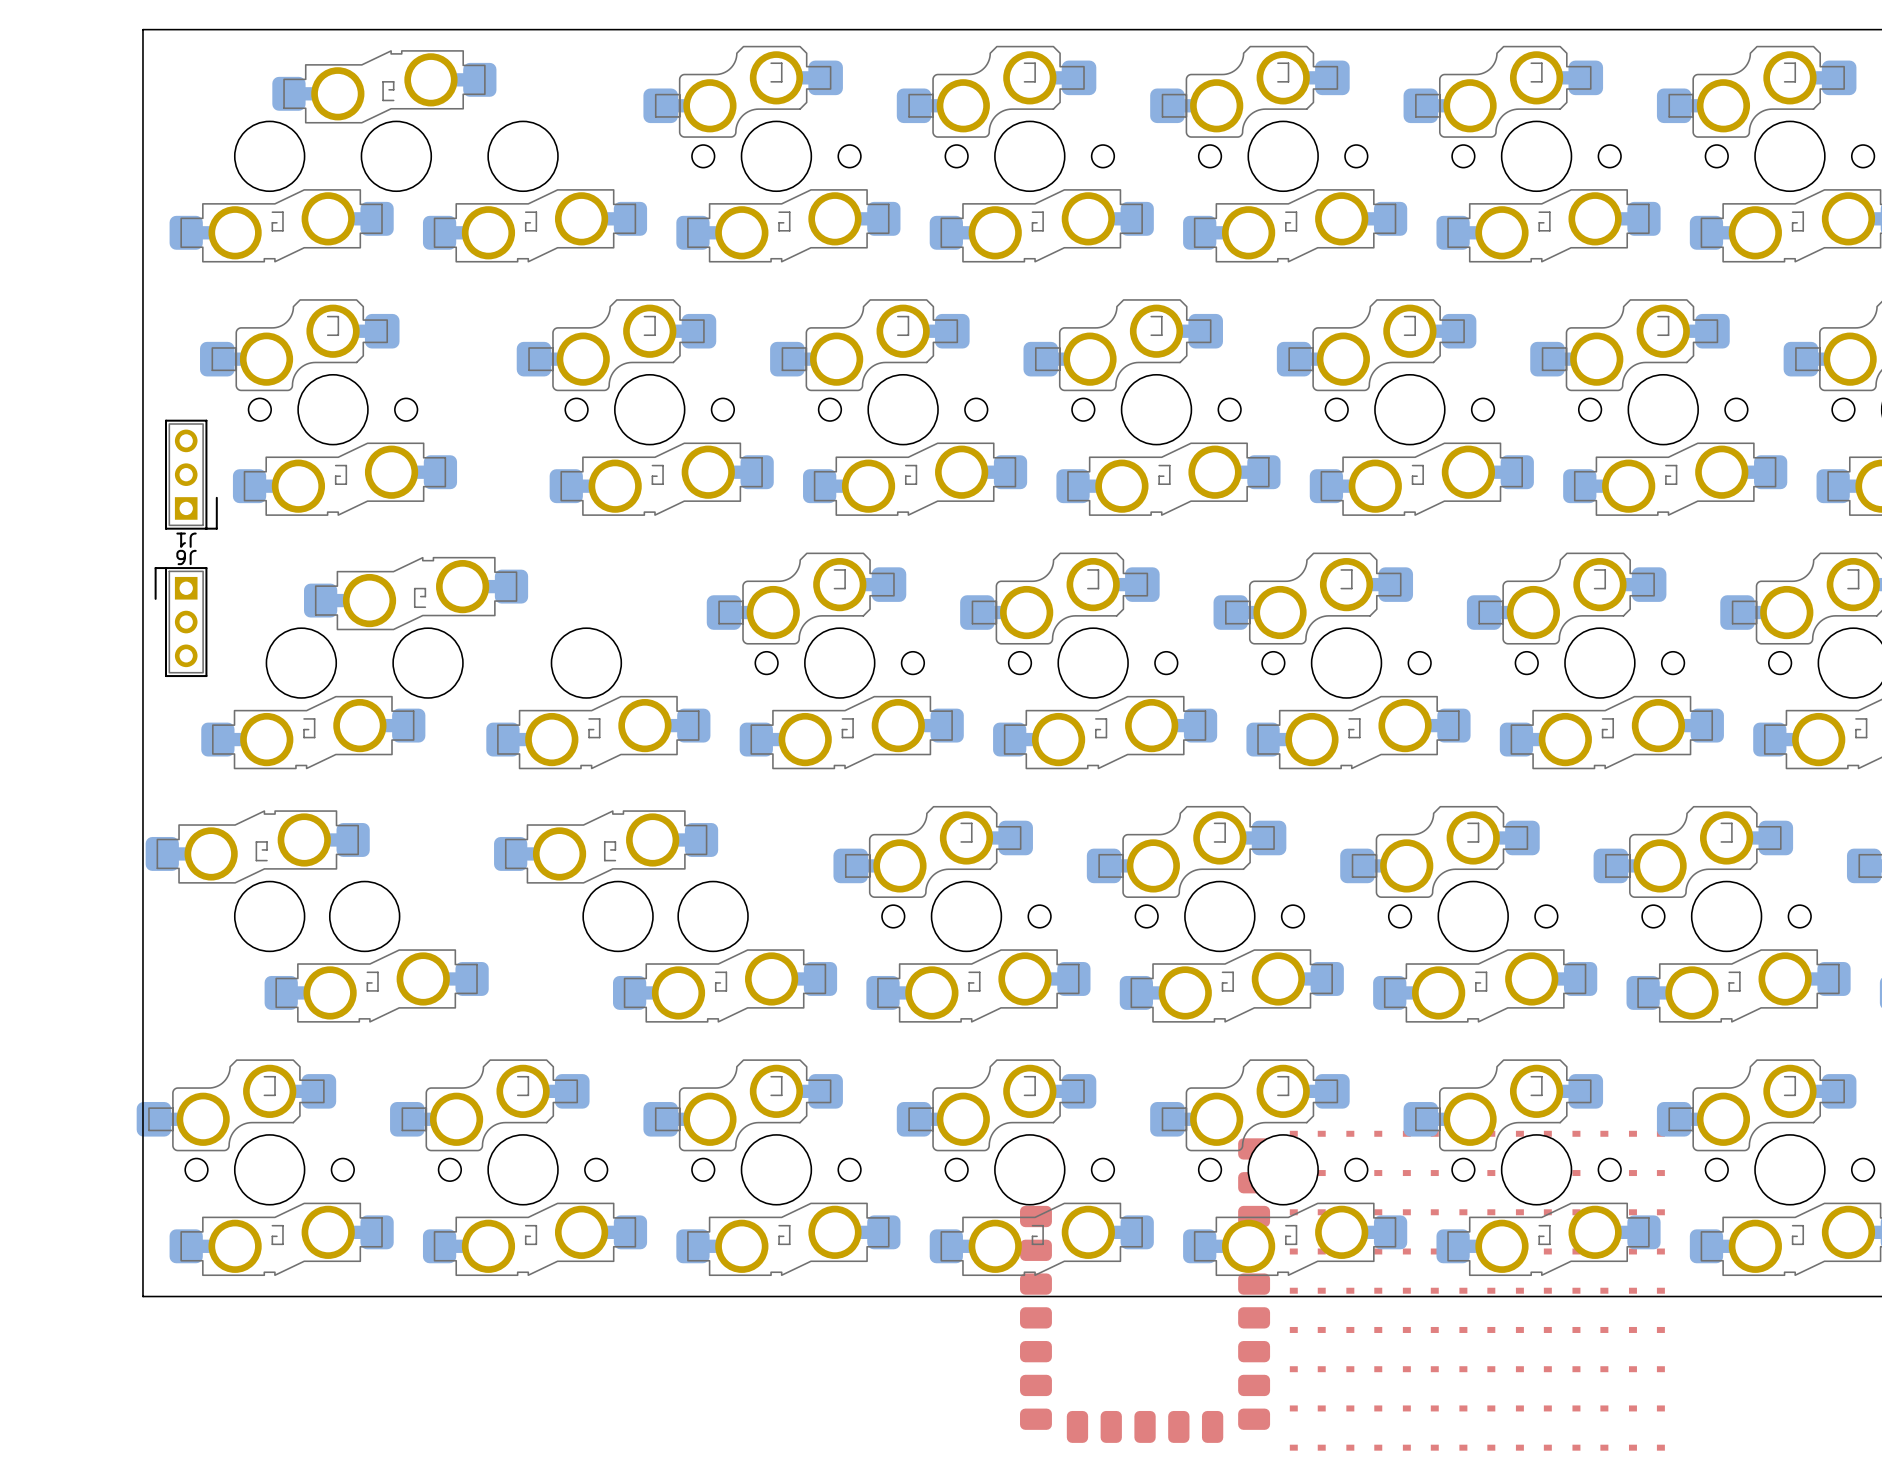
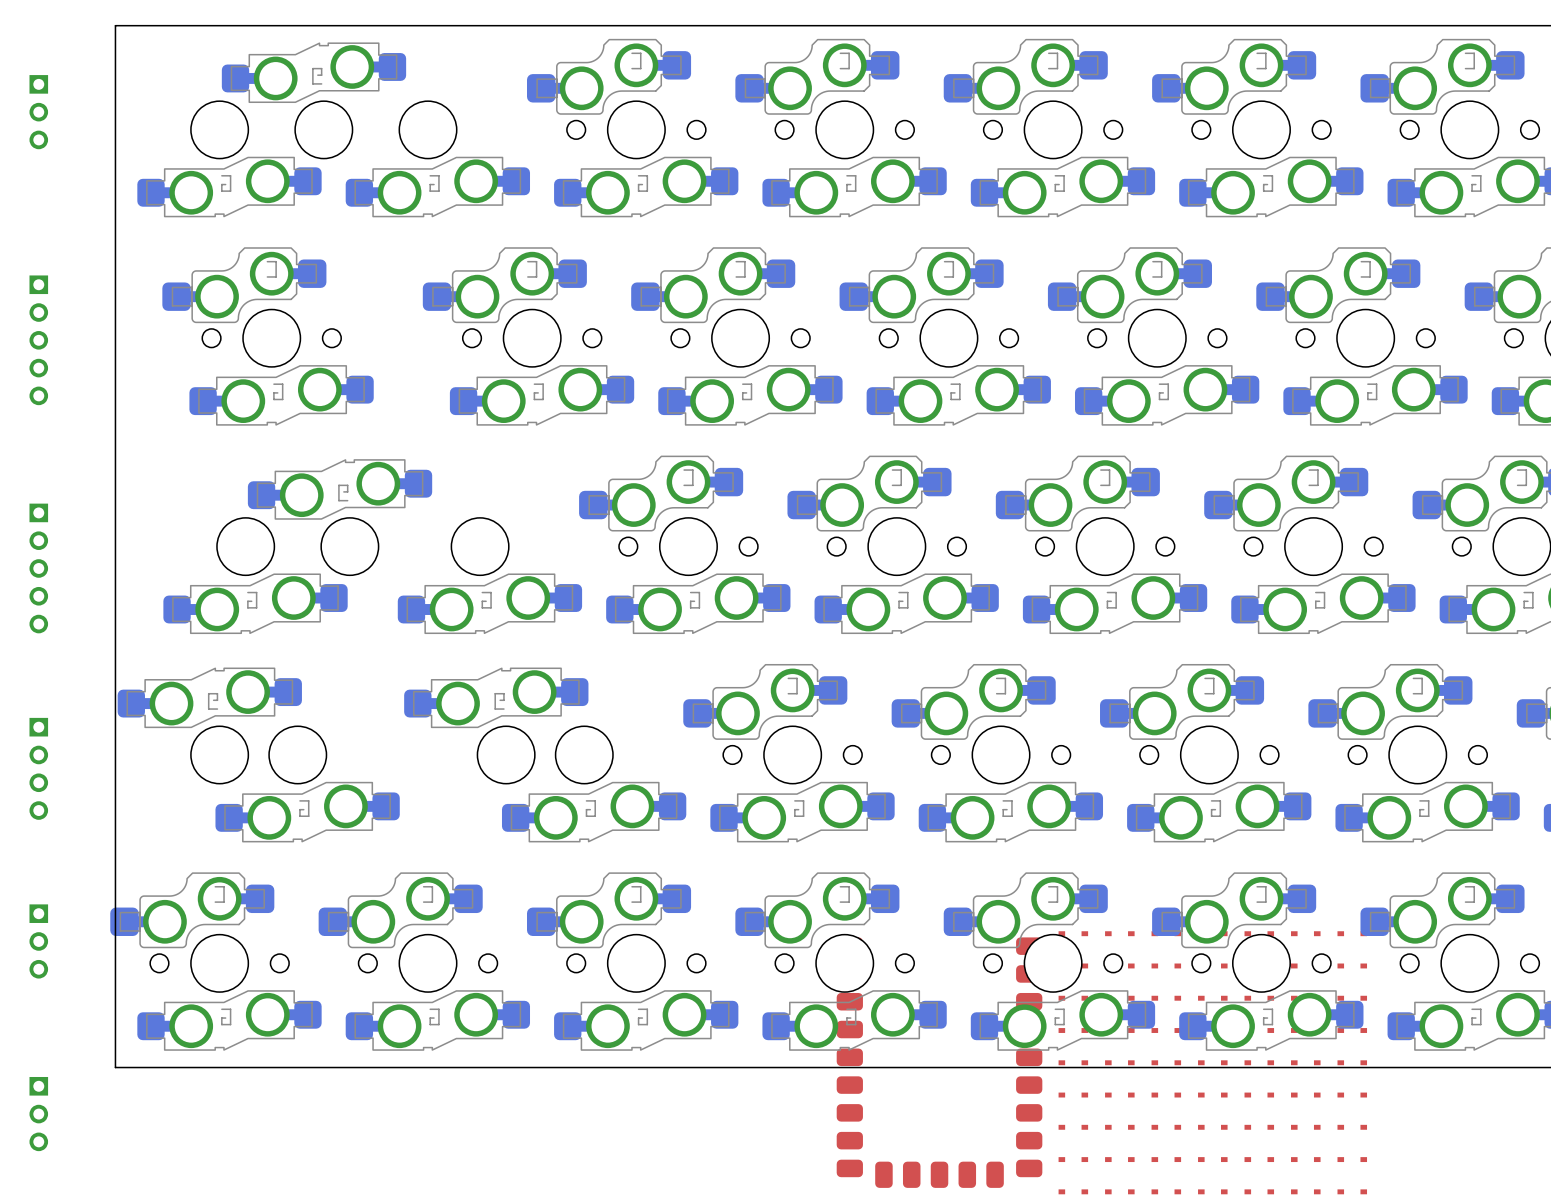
part: none -> (38, 112)
part: none -> (38, 340)
J1: (191, 474) -> none
J6: (181, 622) -> none
part: none -> (38, 568)
part: none -> (38, 768)
part: none -> (38, 941)
part: none -> (38, 1114)

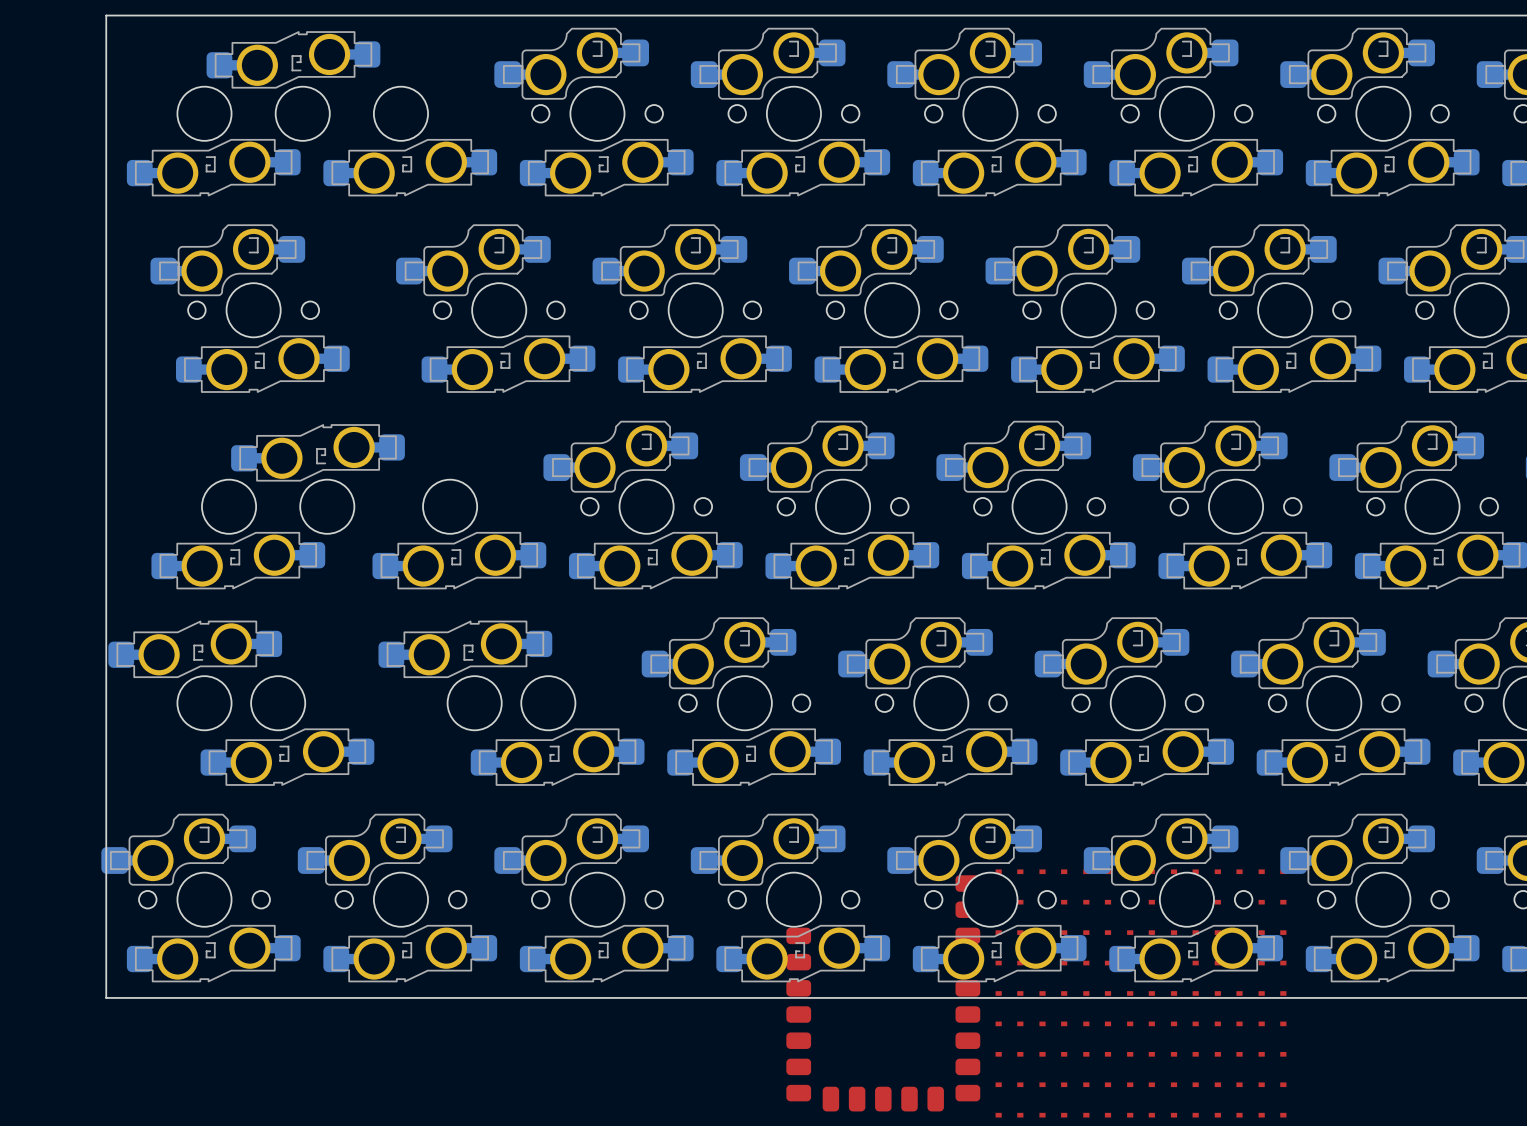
part: (38, 112) -> none
part: (38, 340) -> none
part: (38, 568) -> none
part: (38, 768) -> none
part: (38, 941) -> none
part: (38, 1114) -> none

